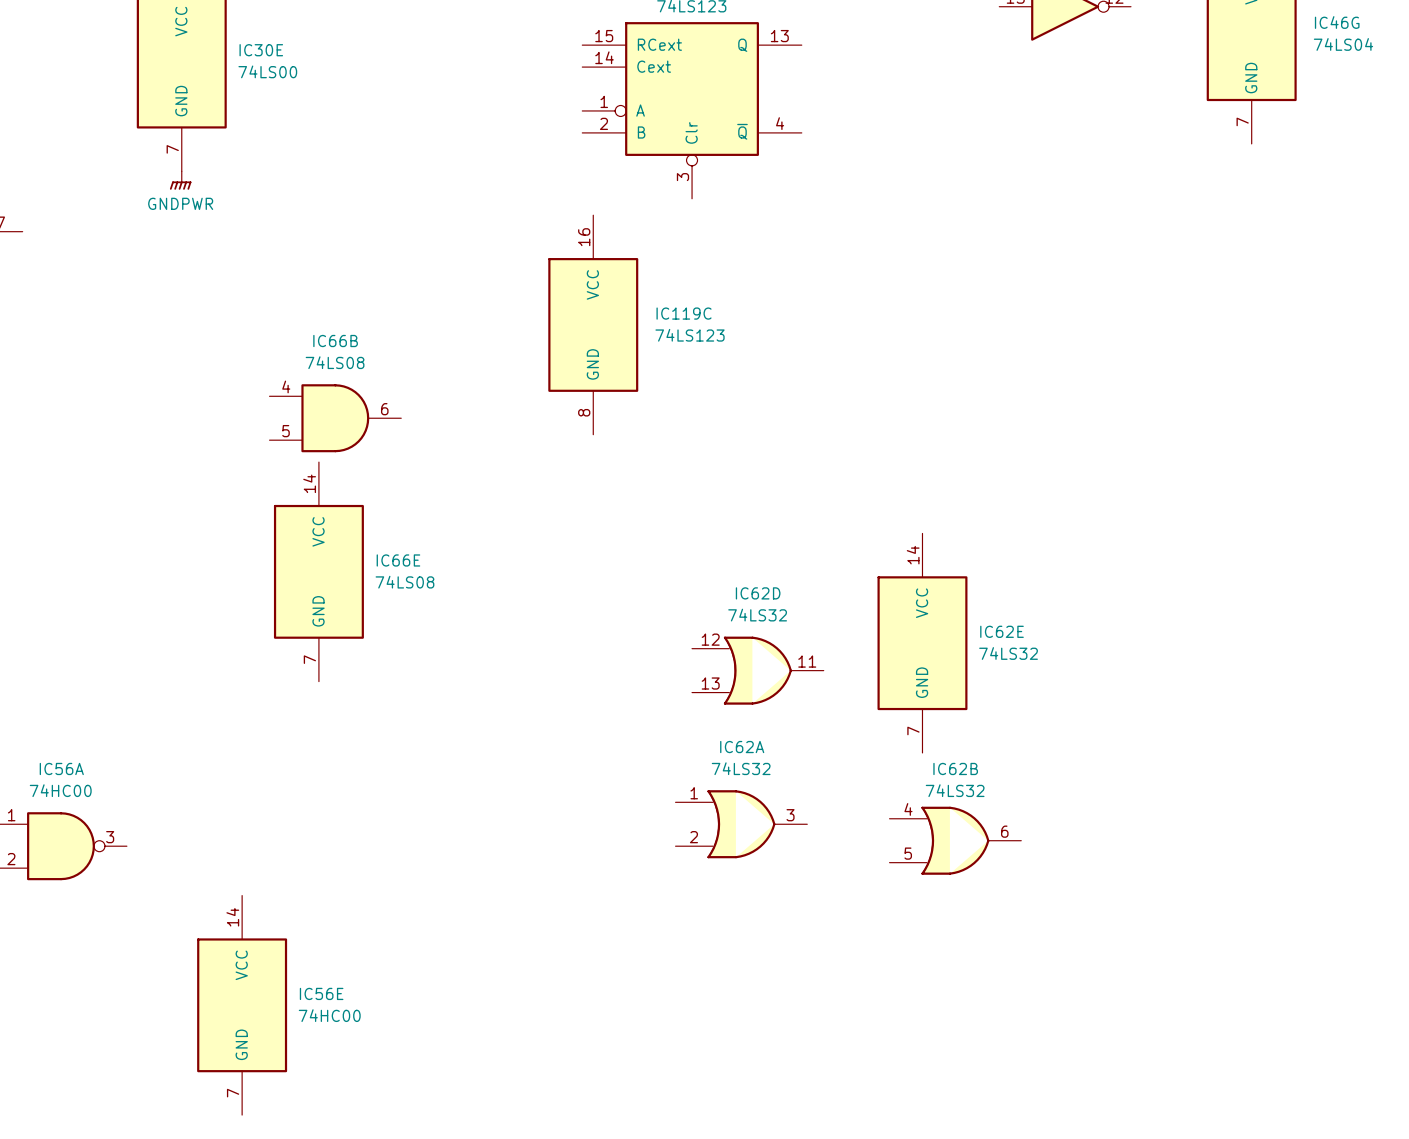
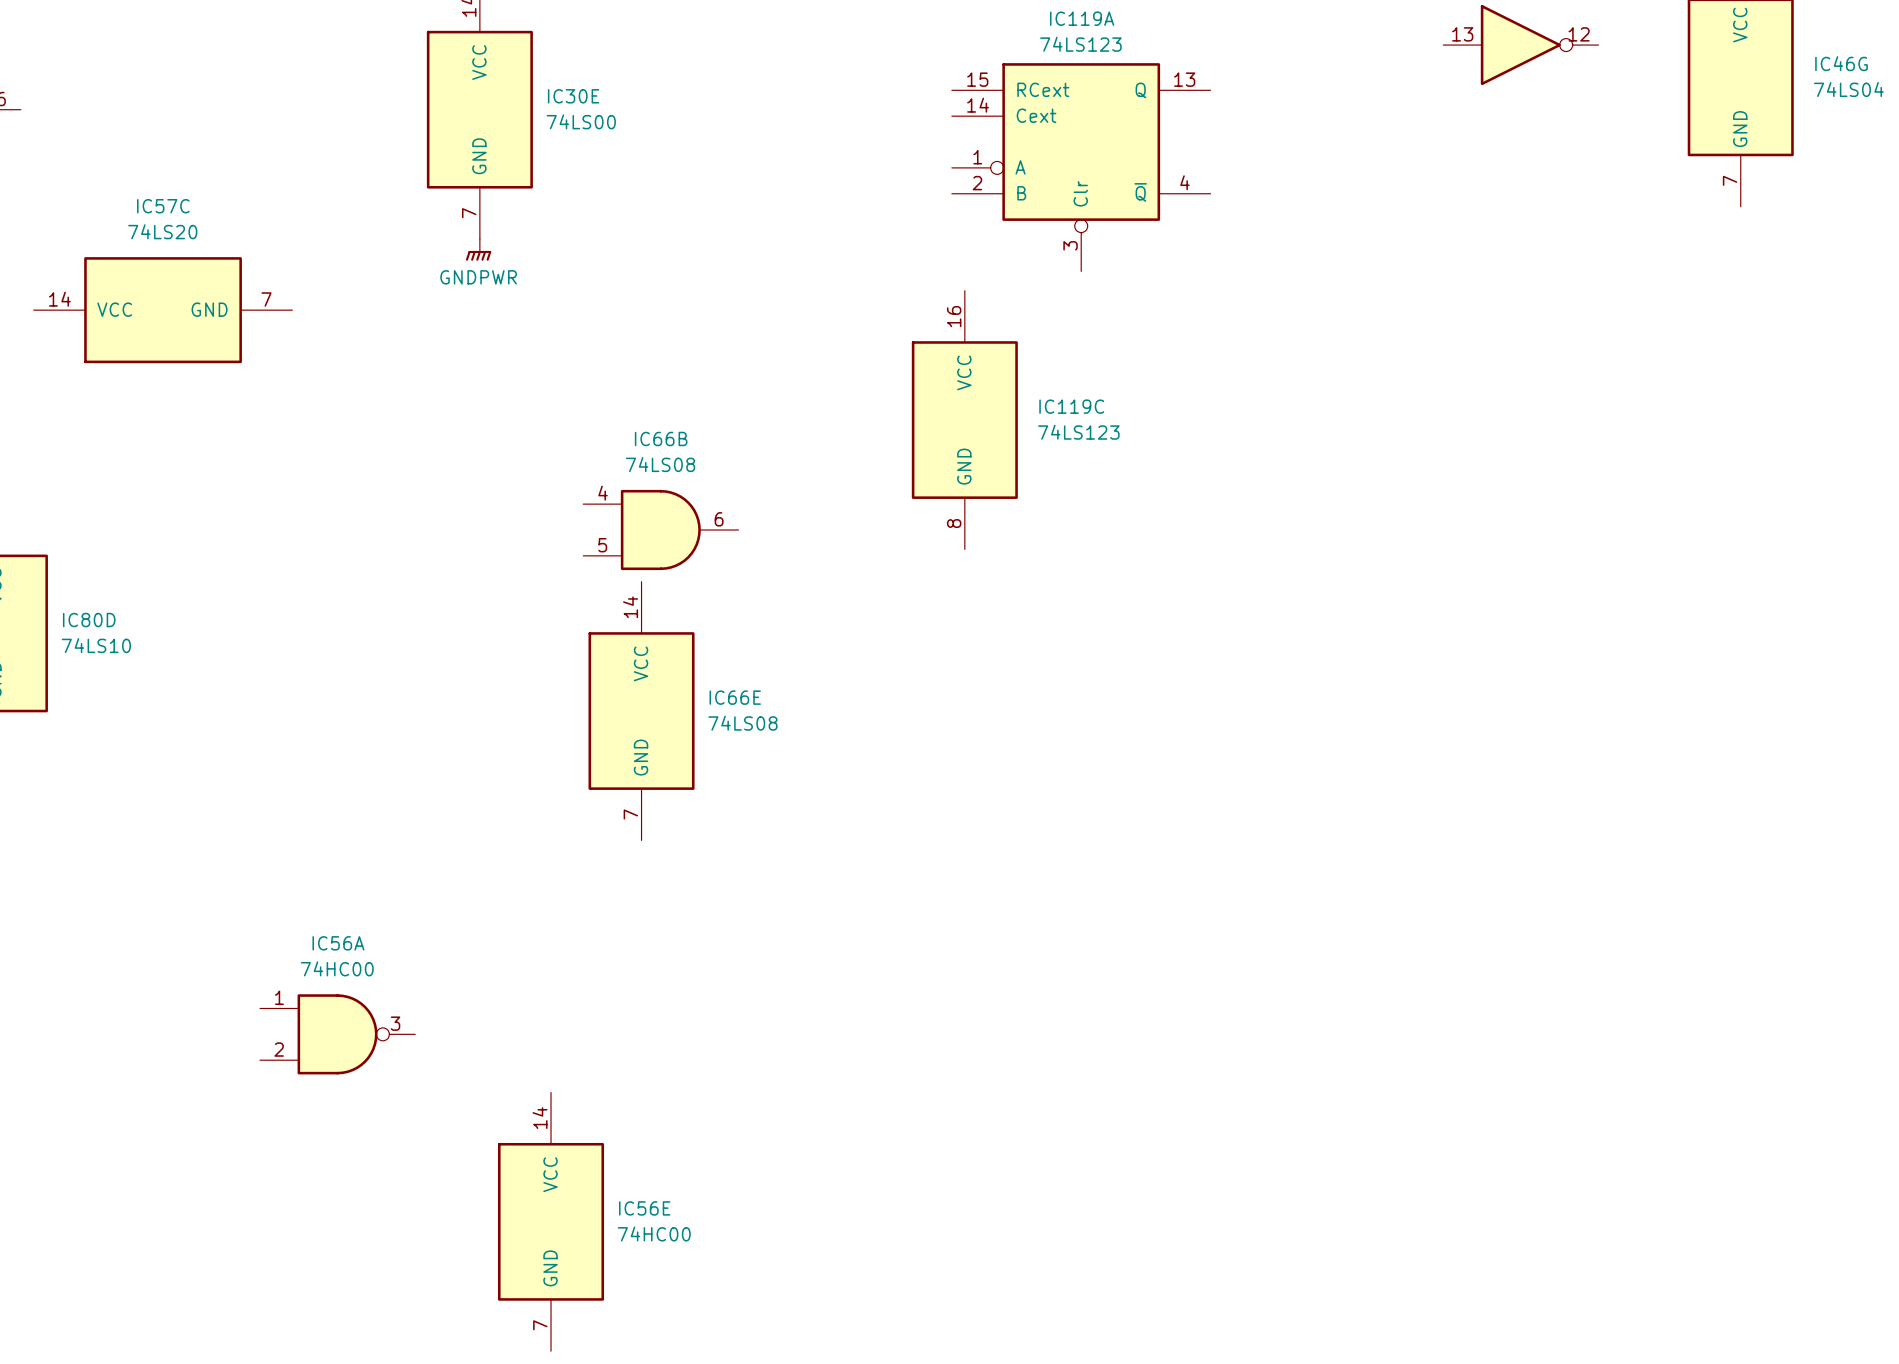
IC62E: 74LS32 (922, 643) -> none
IC62D: 74LS32 (757, 670) -> none
IC62A: 74LS32 (741, 824) -> none
IC62B: 74LS32 (955, 840) -> none

